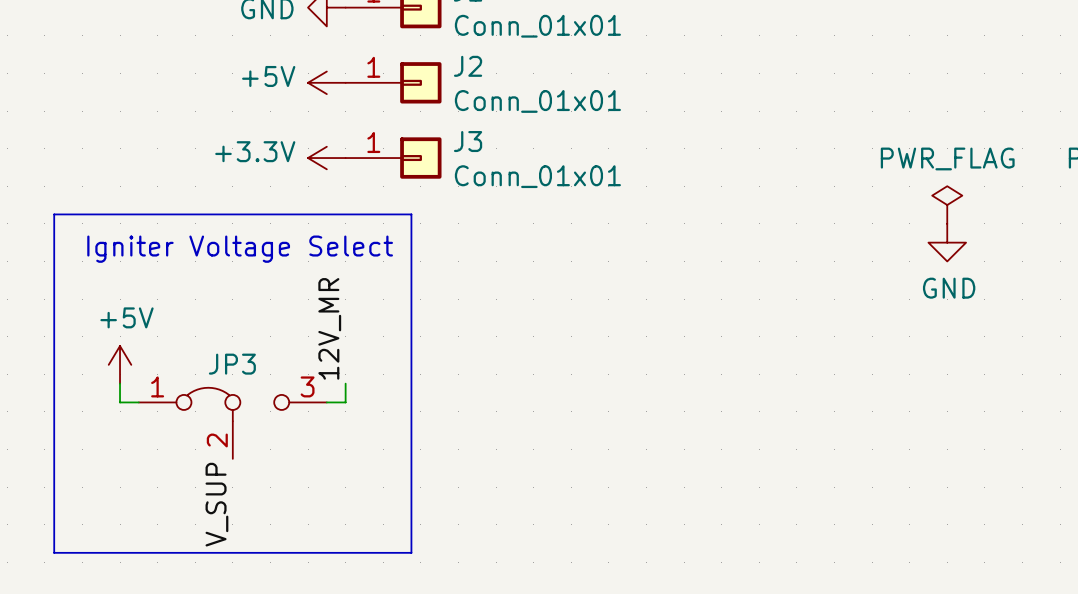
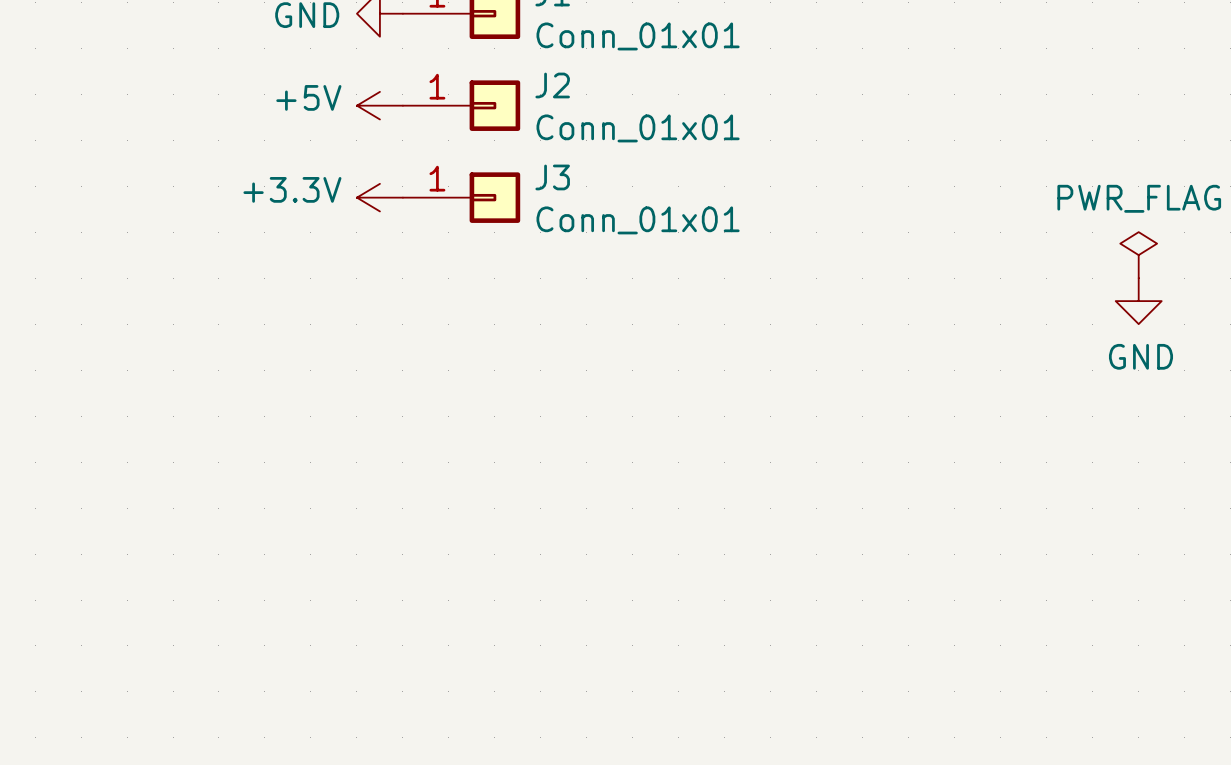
line: (54, 214) (411, 214) (411, 552) (54, 552) (54, 214) -> none
text: Igniter Voltage Select (240, 249) -> none
label: 12V_MR (329, 328) -> none
power symbol: +5V (120, 364) -> none
wire: (120, 383) (120, 402) (138, 402) -> none
wire: (345, 383) (345, 402) (326, 402) -> none
JP3: (232, 423) -> none
label: V_SUP (216, 504) -> none

